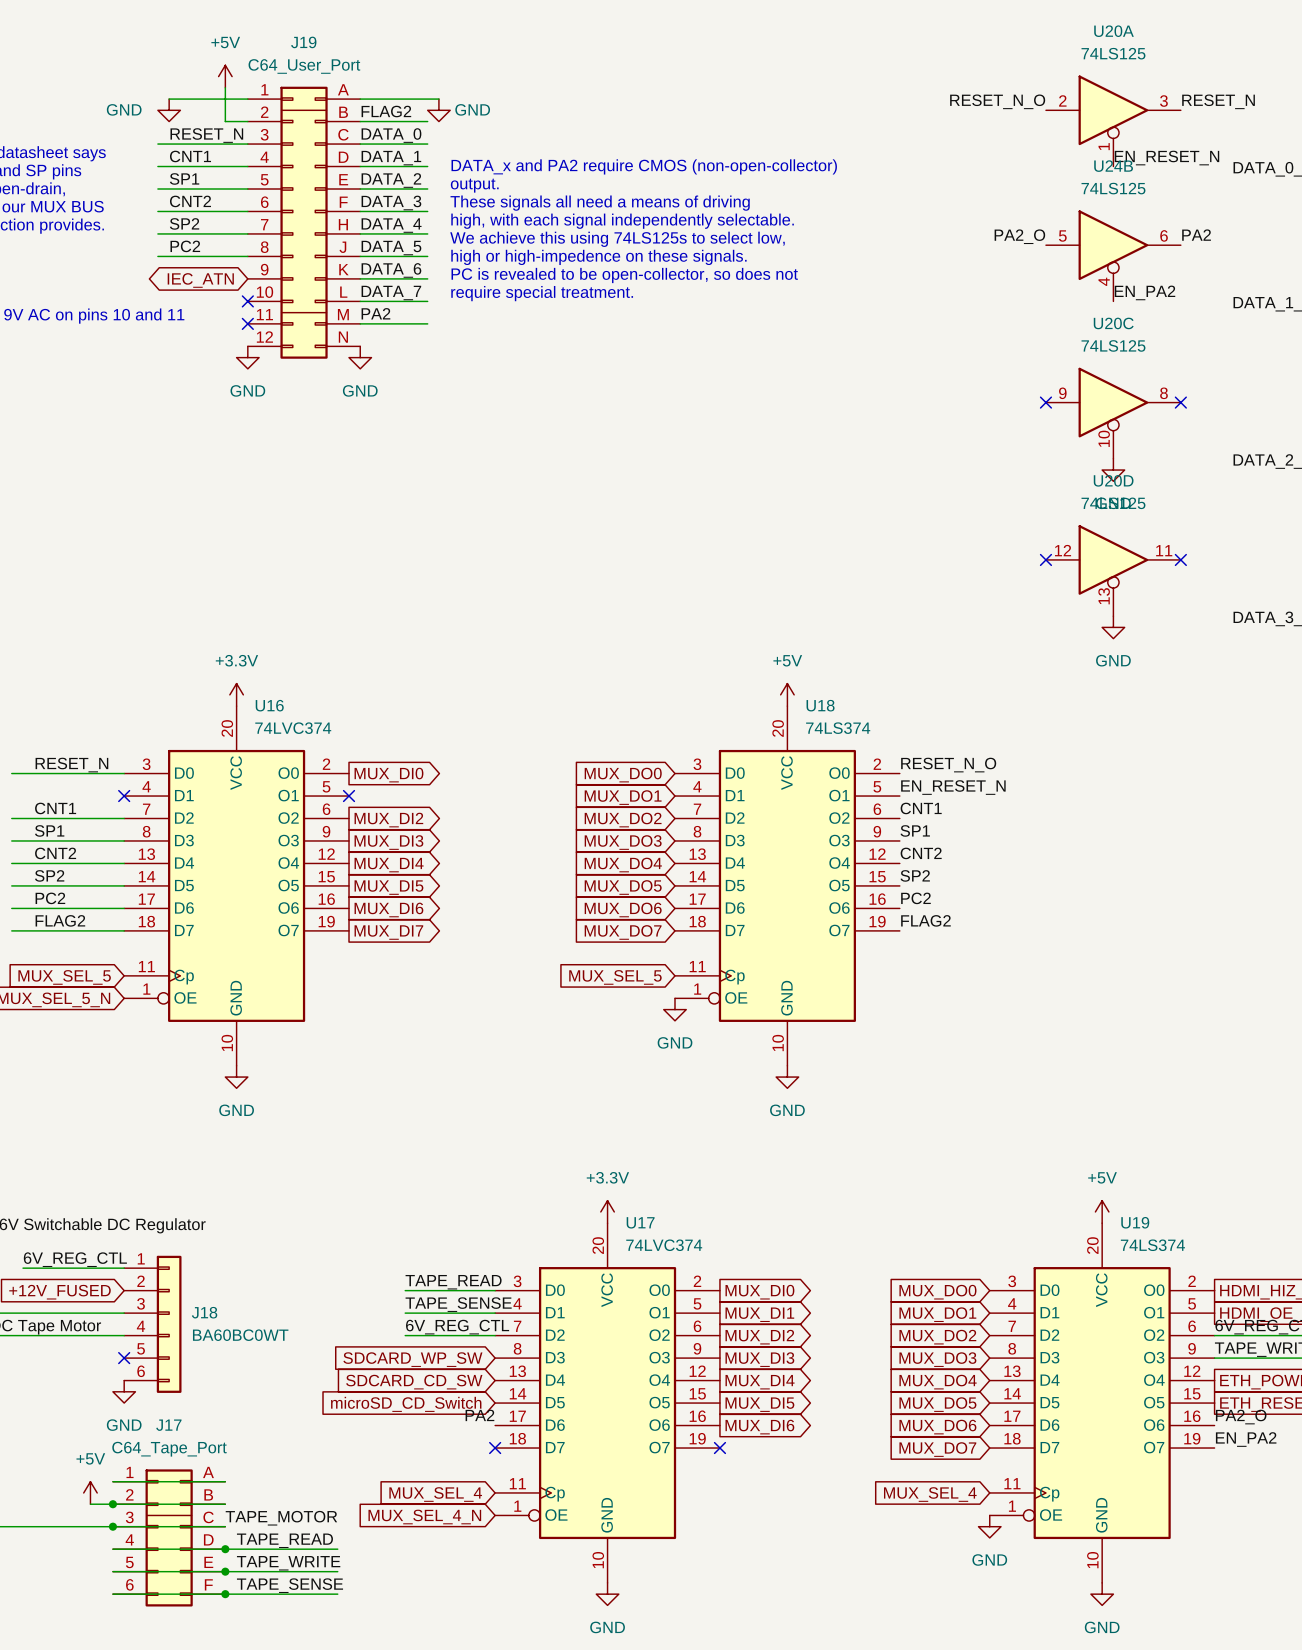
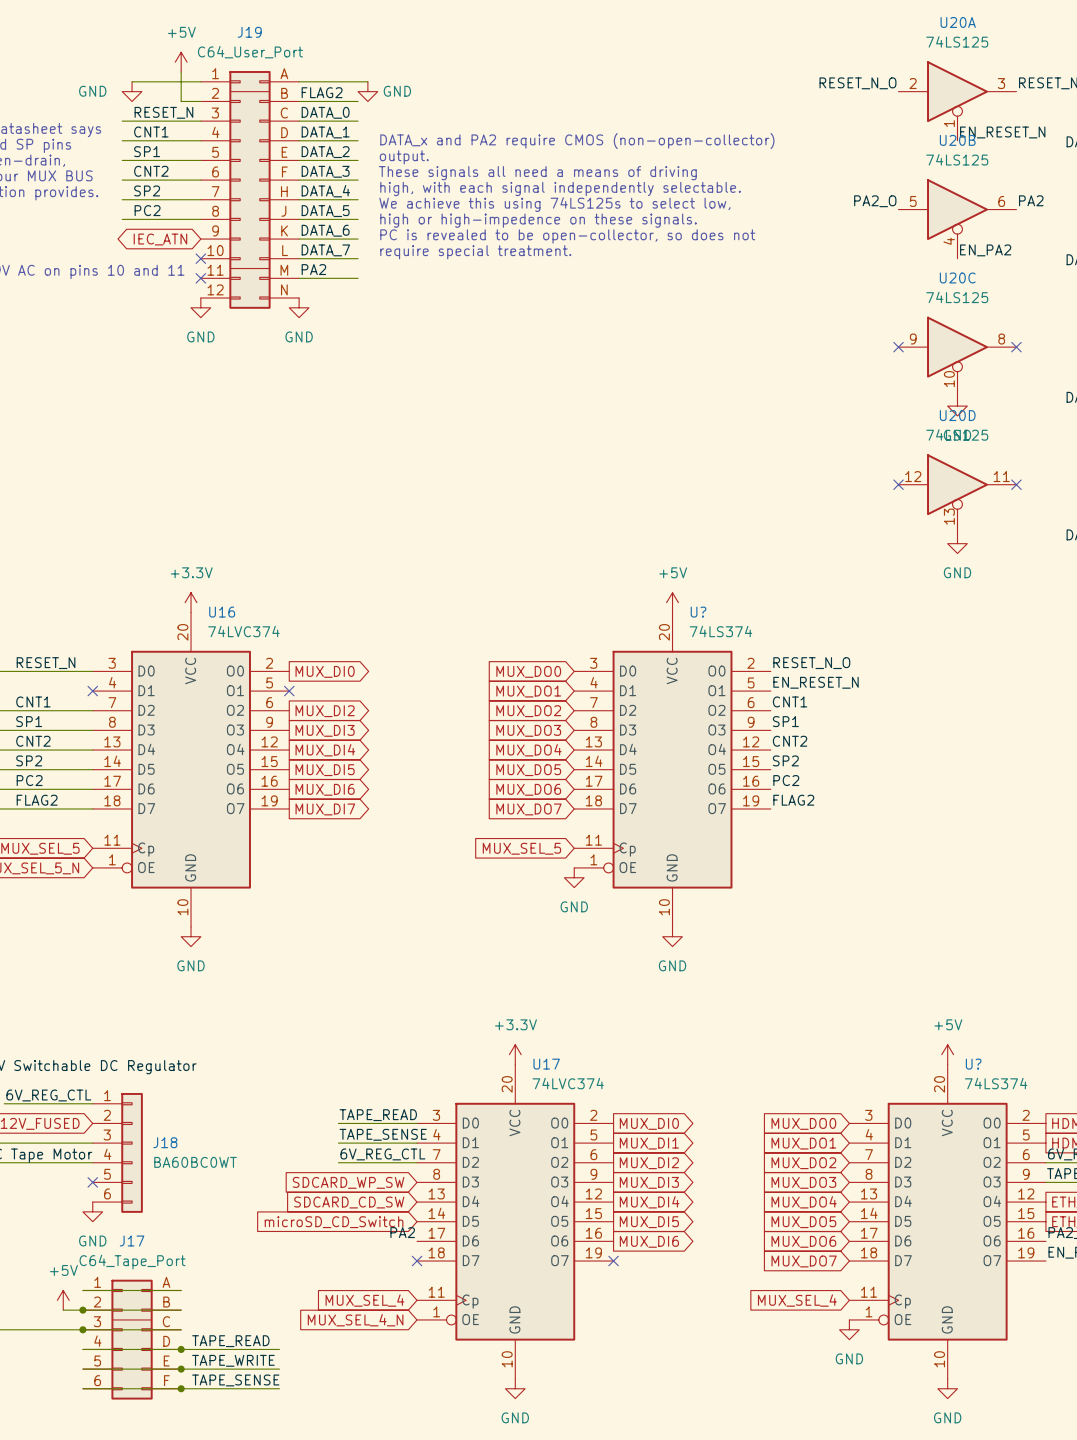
U24B name: U24B (1113, 166) -> U20B (957, 140)
U18 name: U18 (820, 705) -> U? (698, 612)
U19 name: U19 (1135, 1222) -> U? (973, 1064)
label: TAPE_MOTOR (281, 1518) -> none

